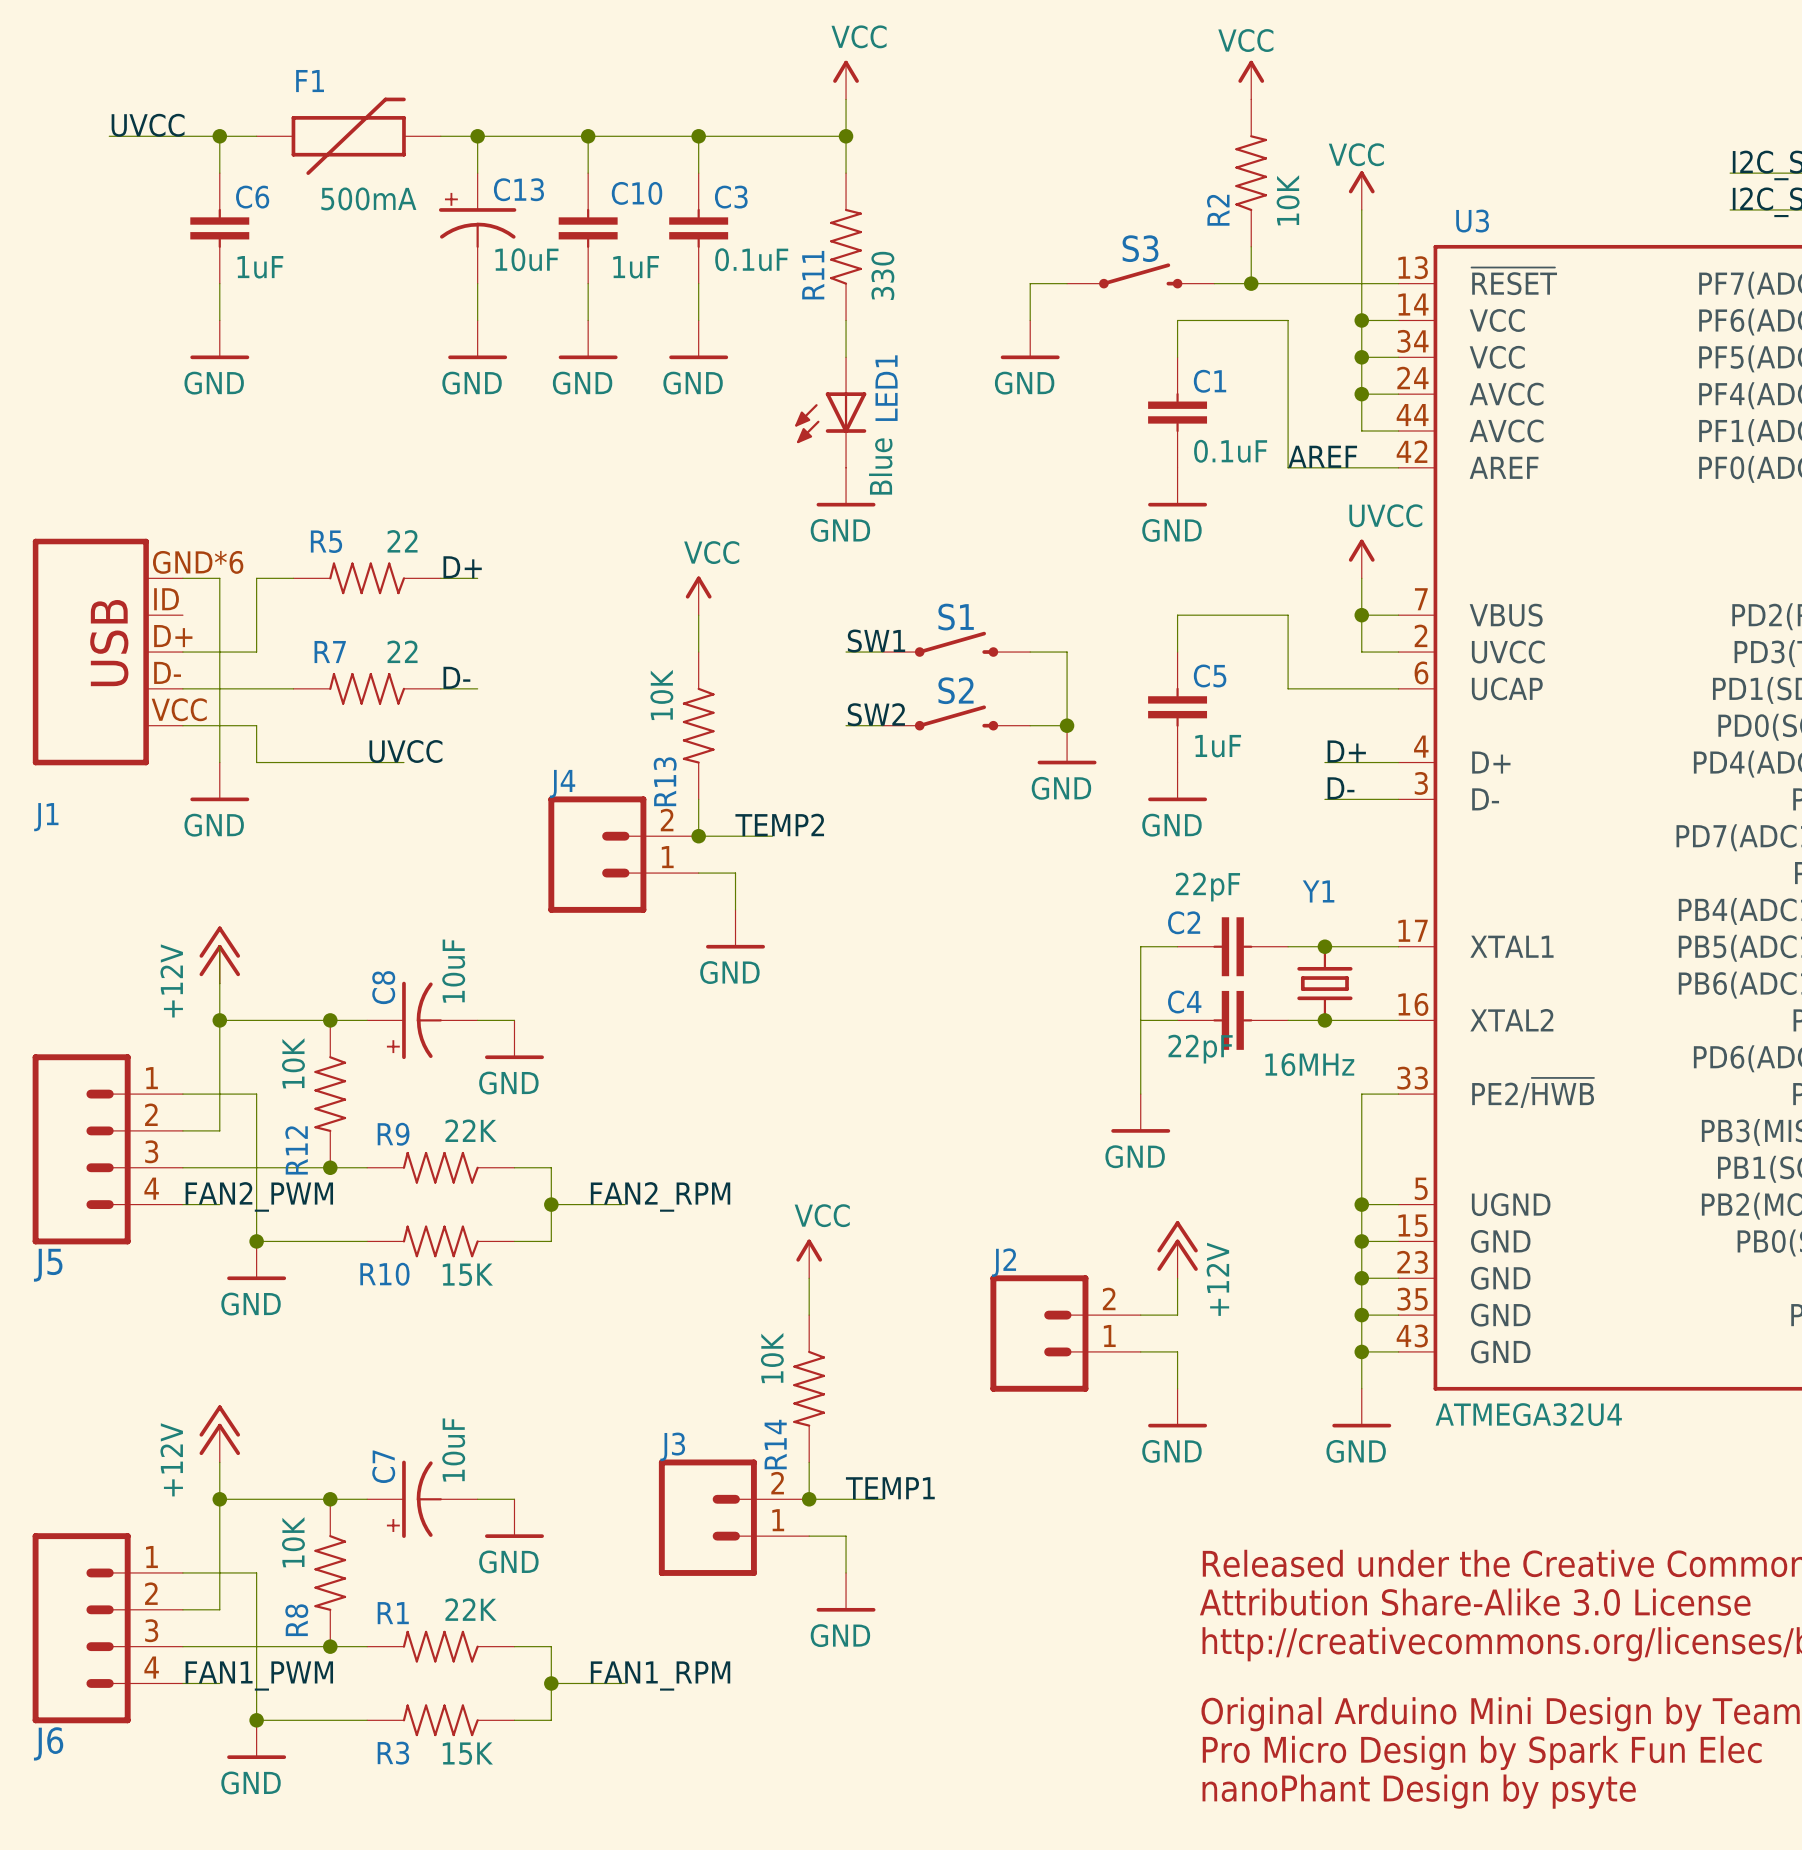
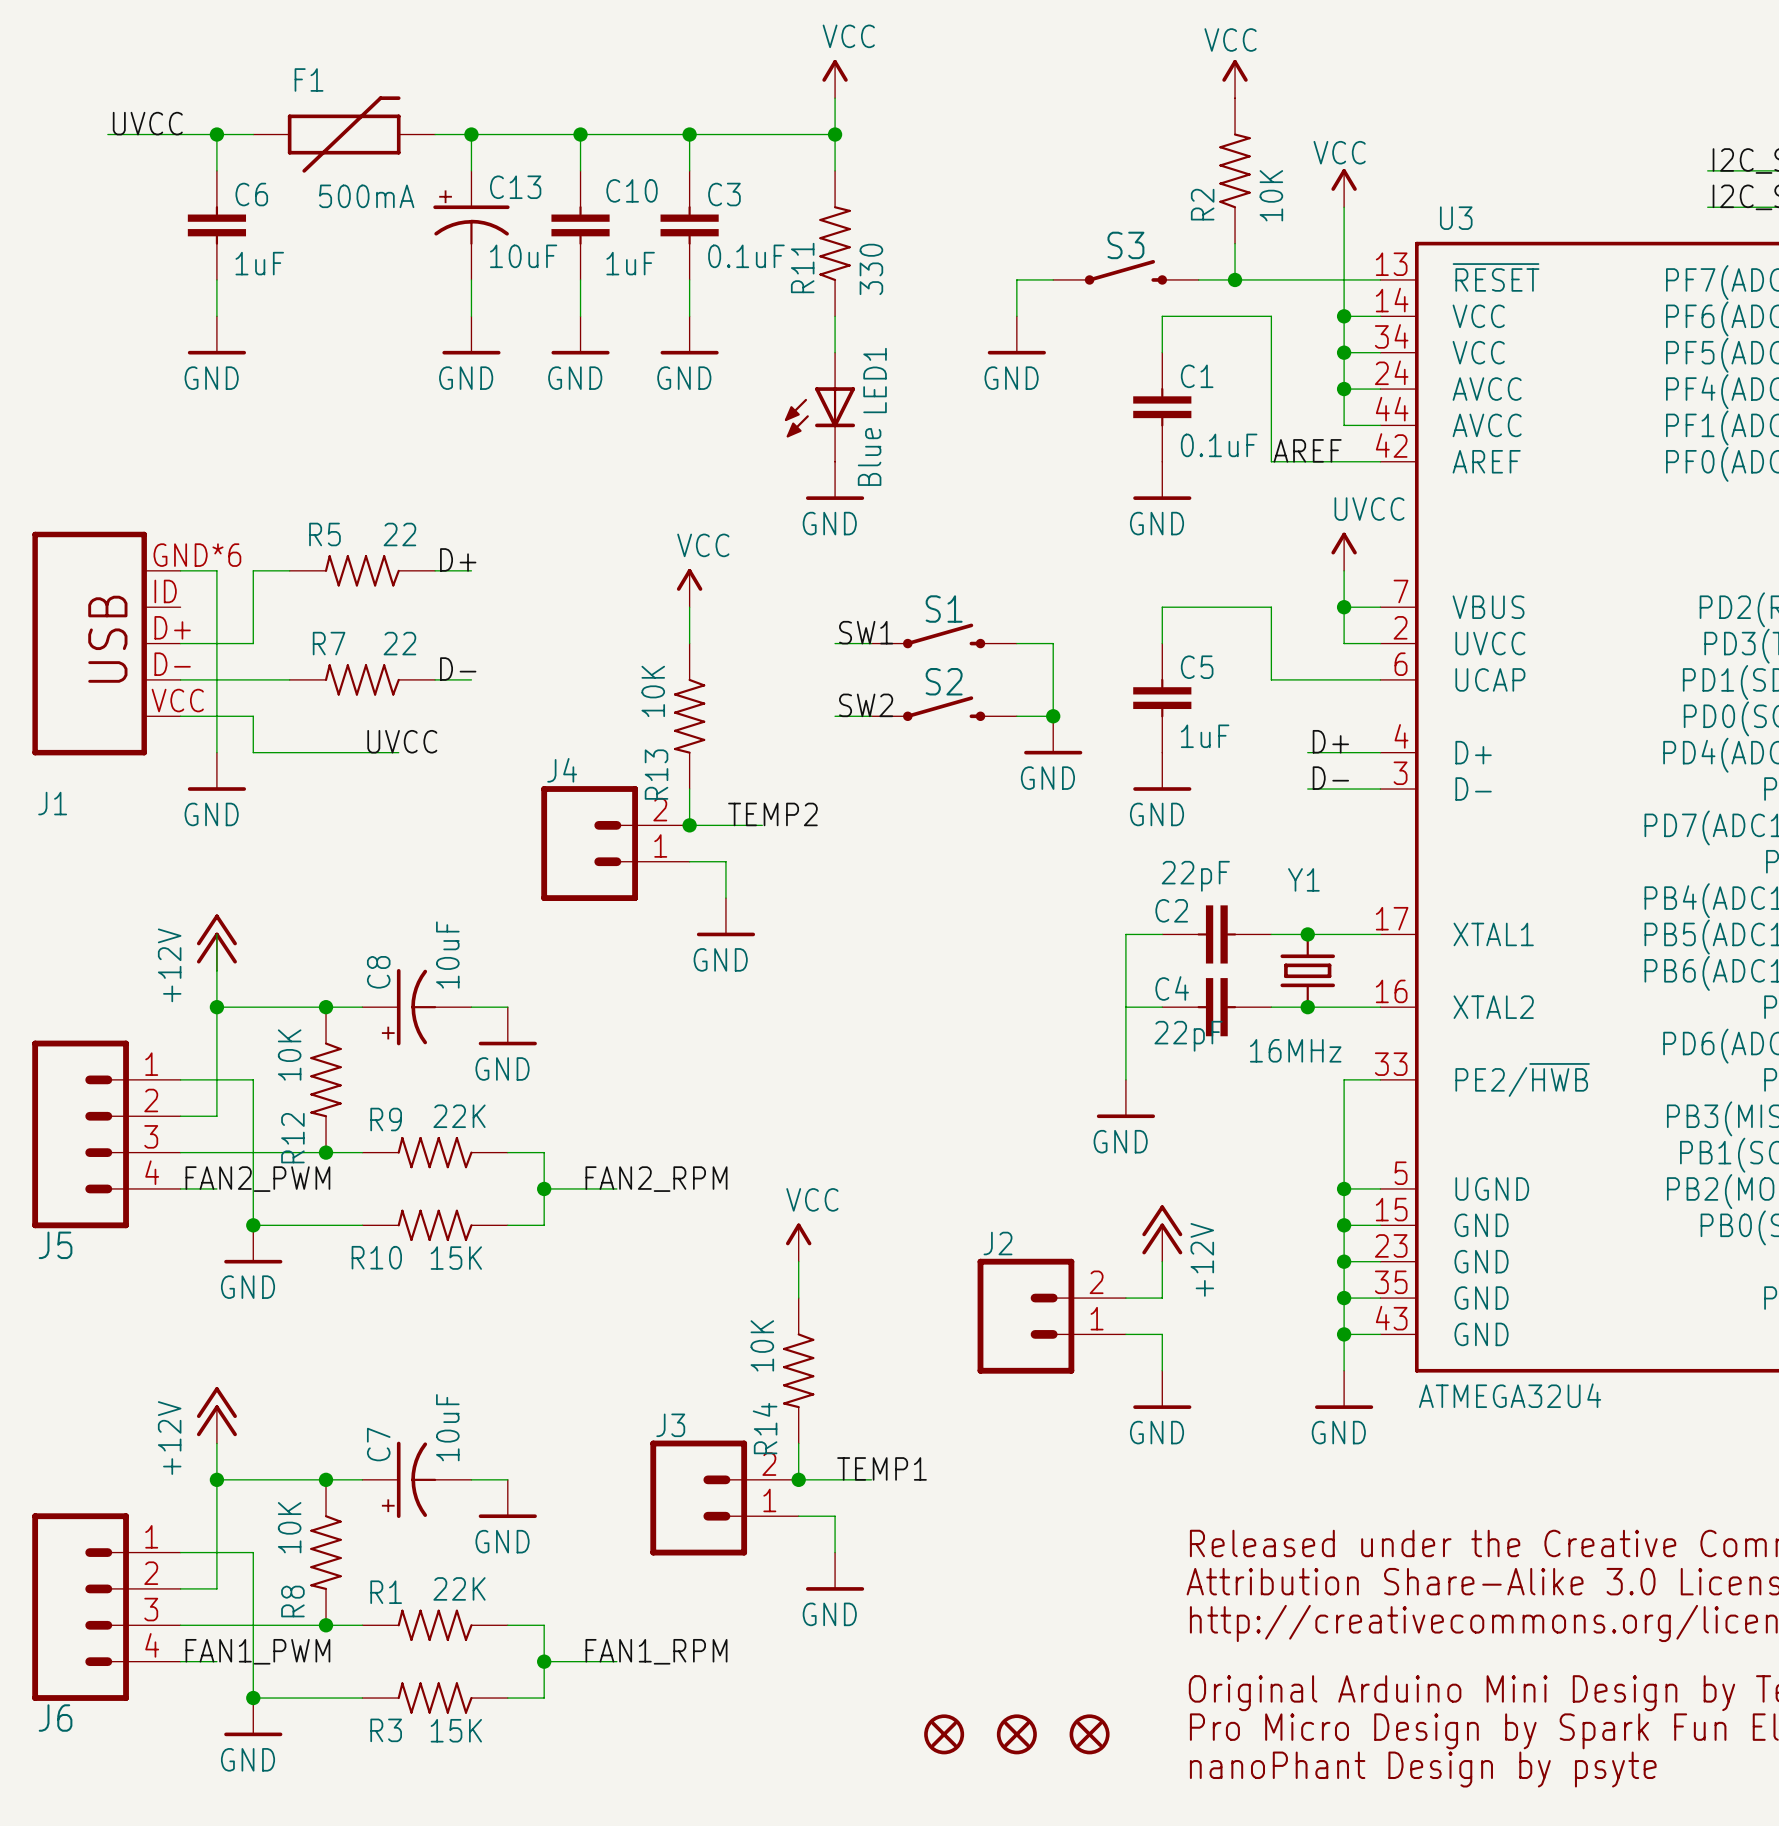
part: none -> (944, 1734)
part: none -> (1016, 1734)
part: none -> (1089, 1734)

